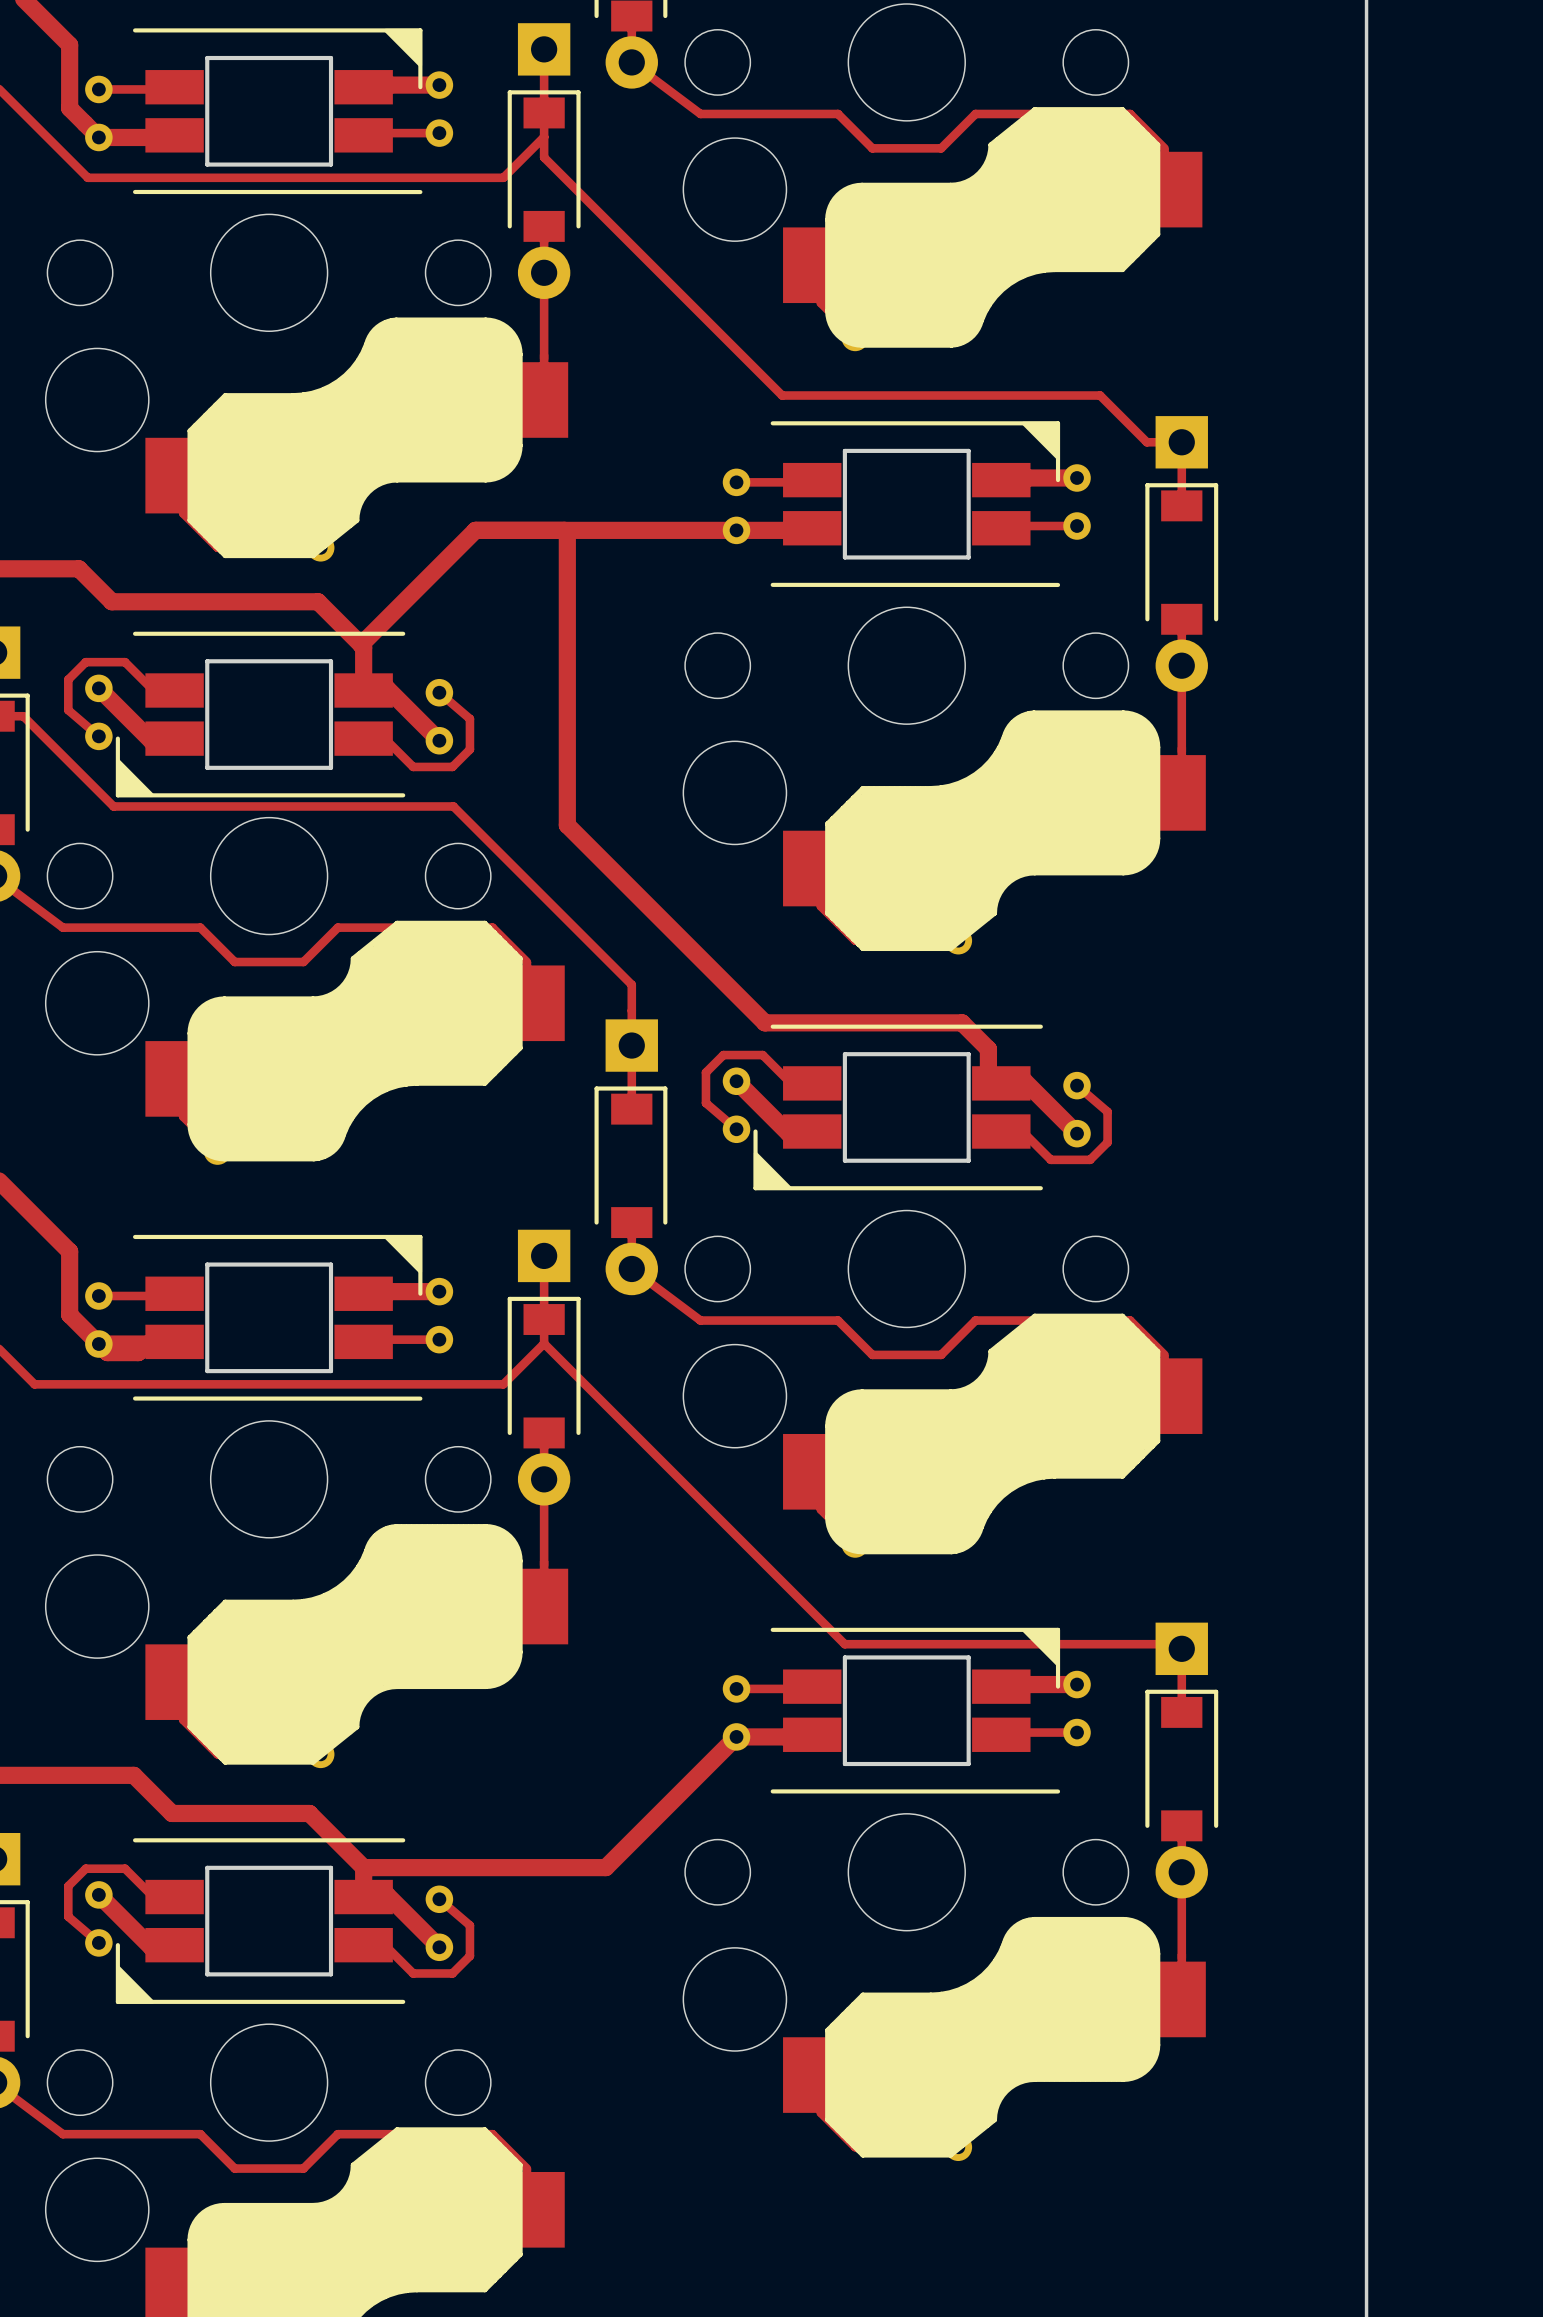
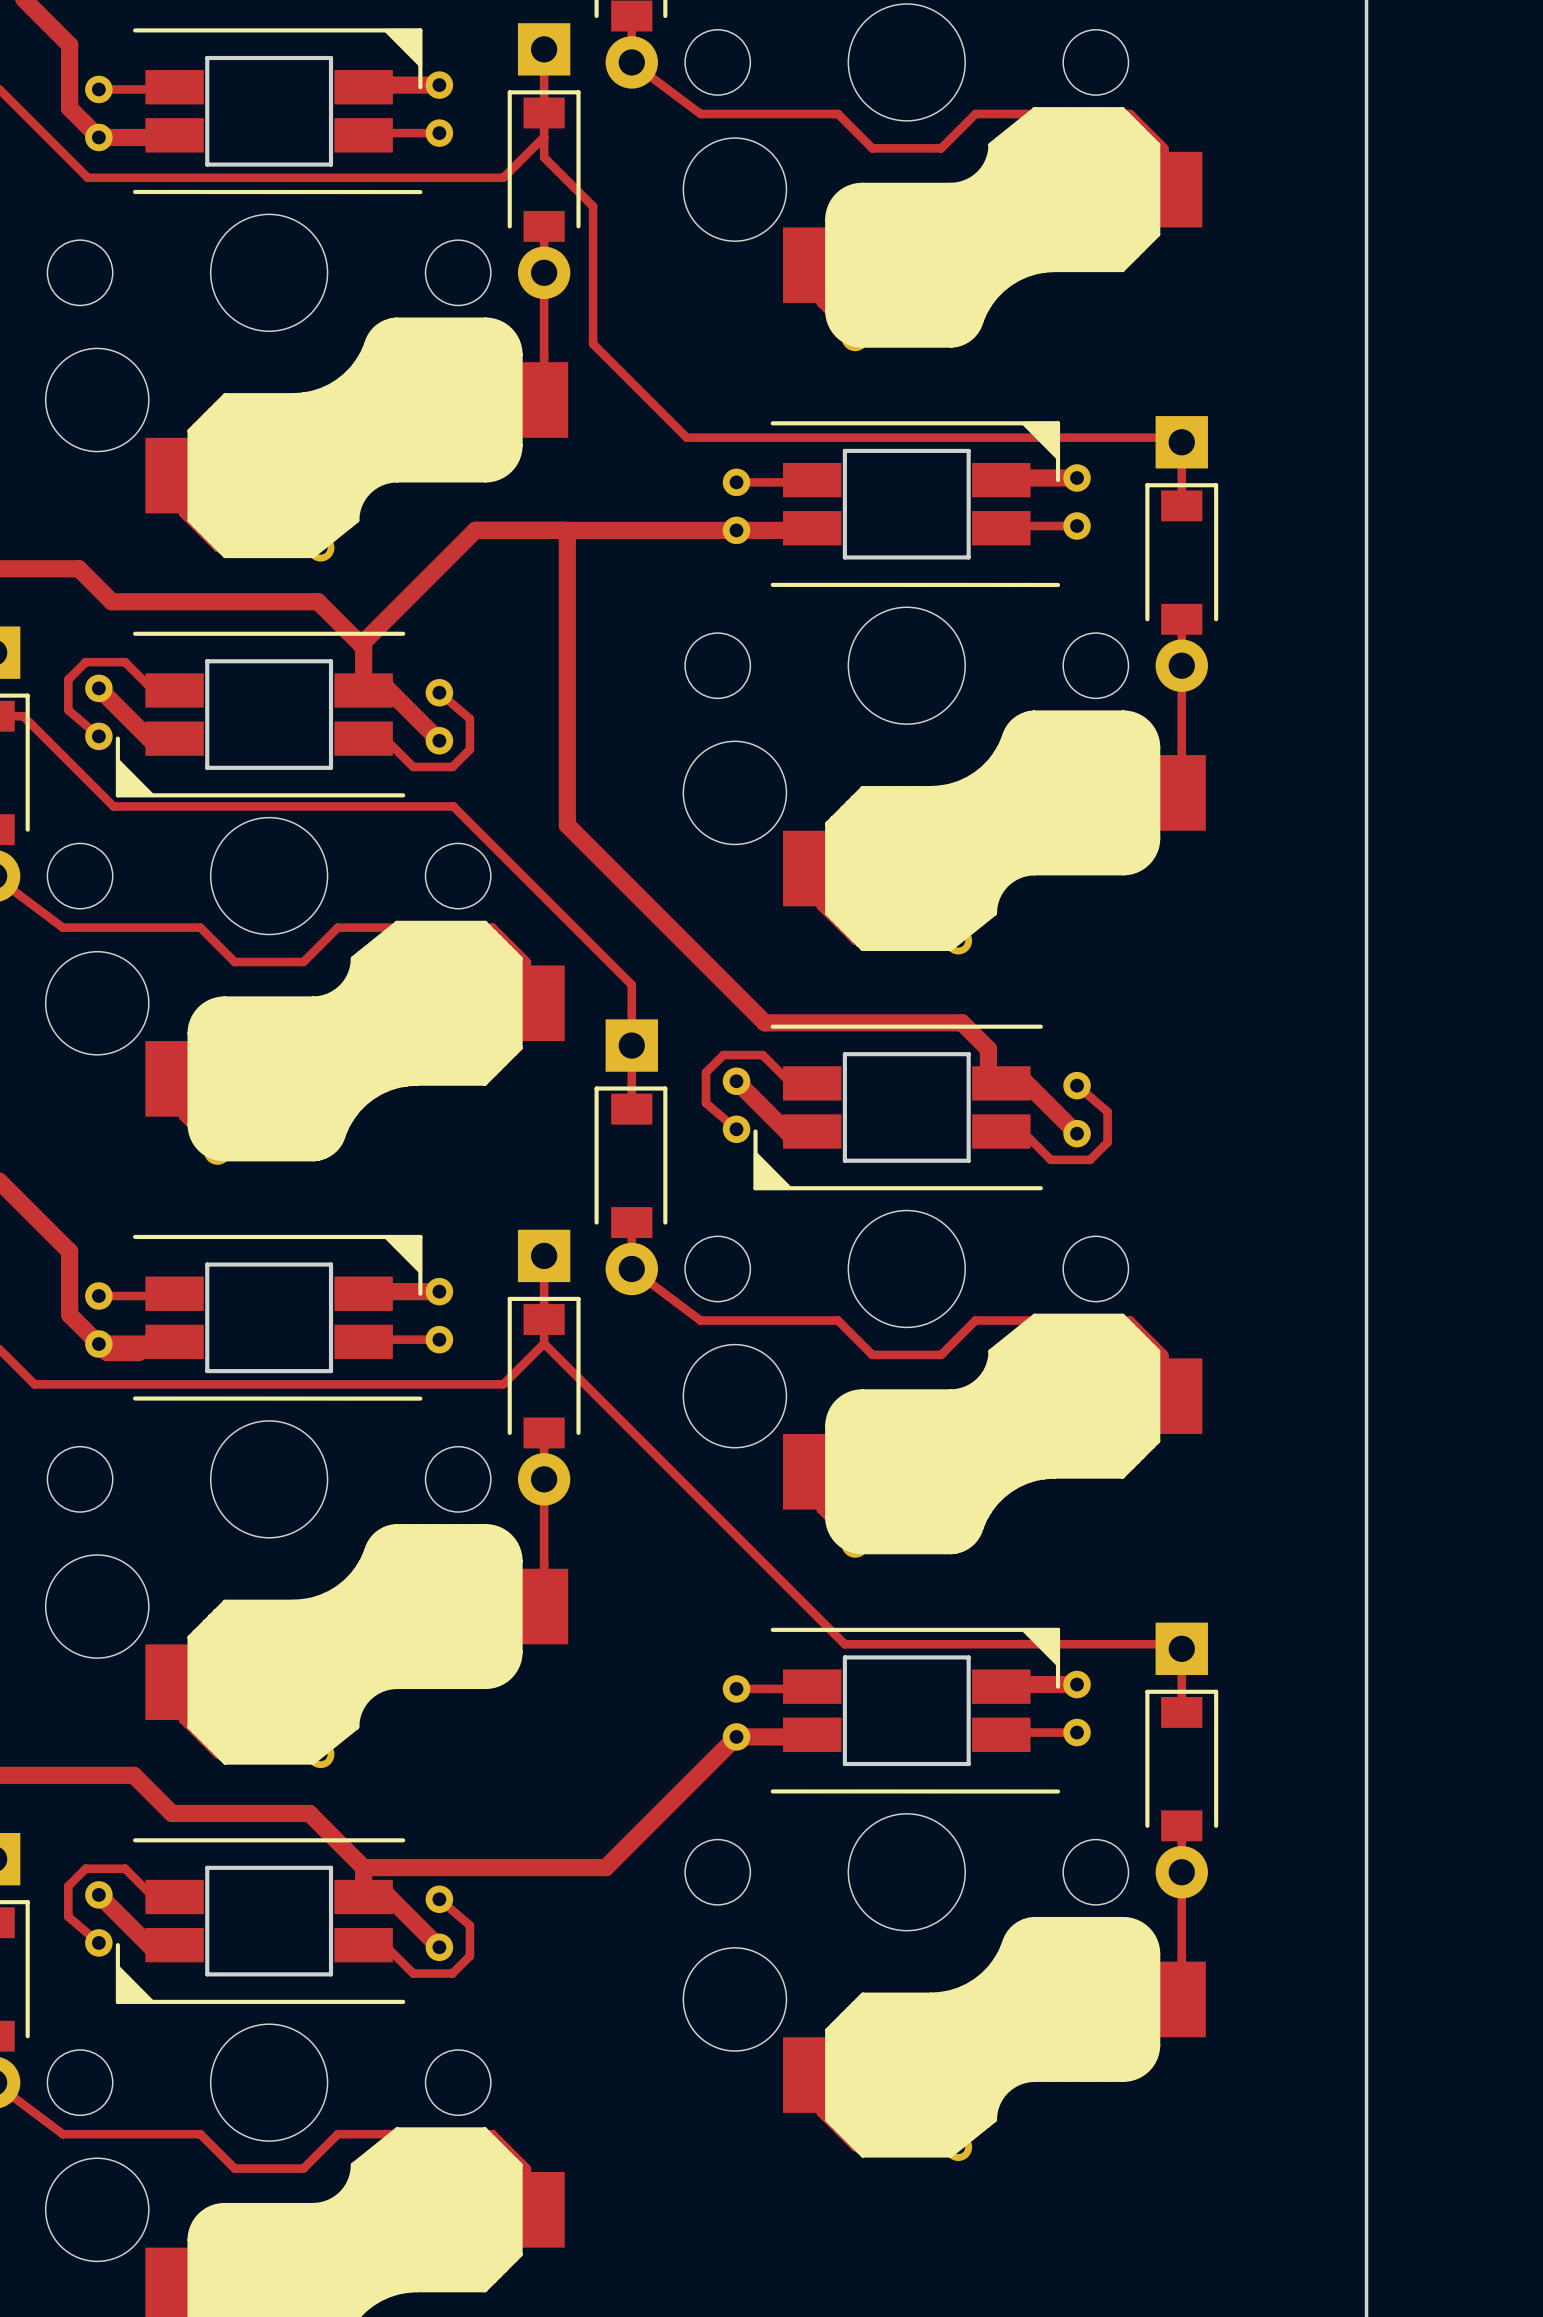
track: (593, 206) (782, 395) (1100, 395) (1146, 442) (1181, 442) -> (593, 206) (593, 343) (686, 437) (1177, 437) (1181, 442)

